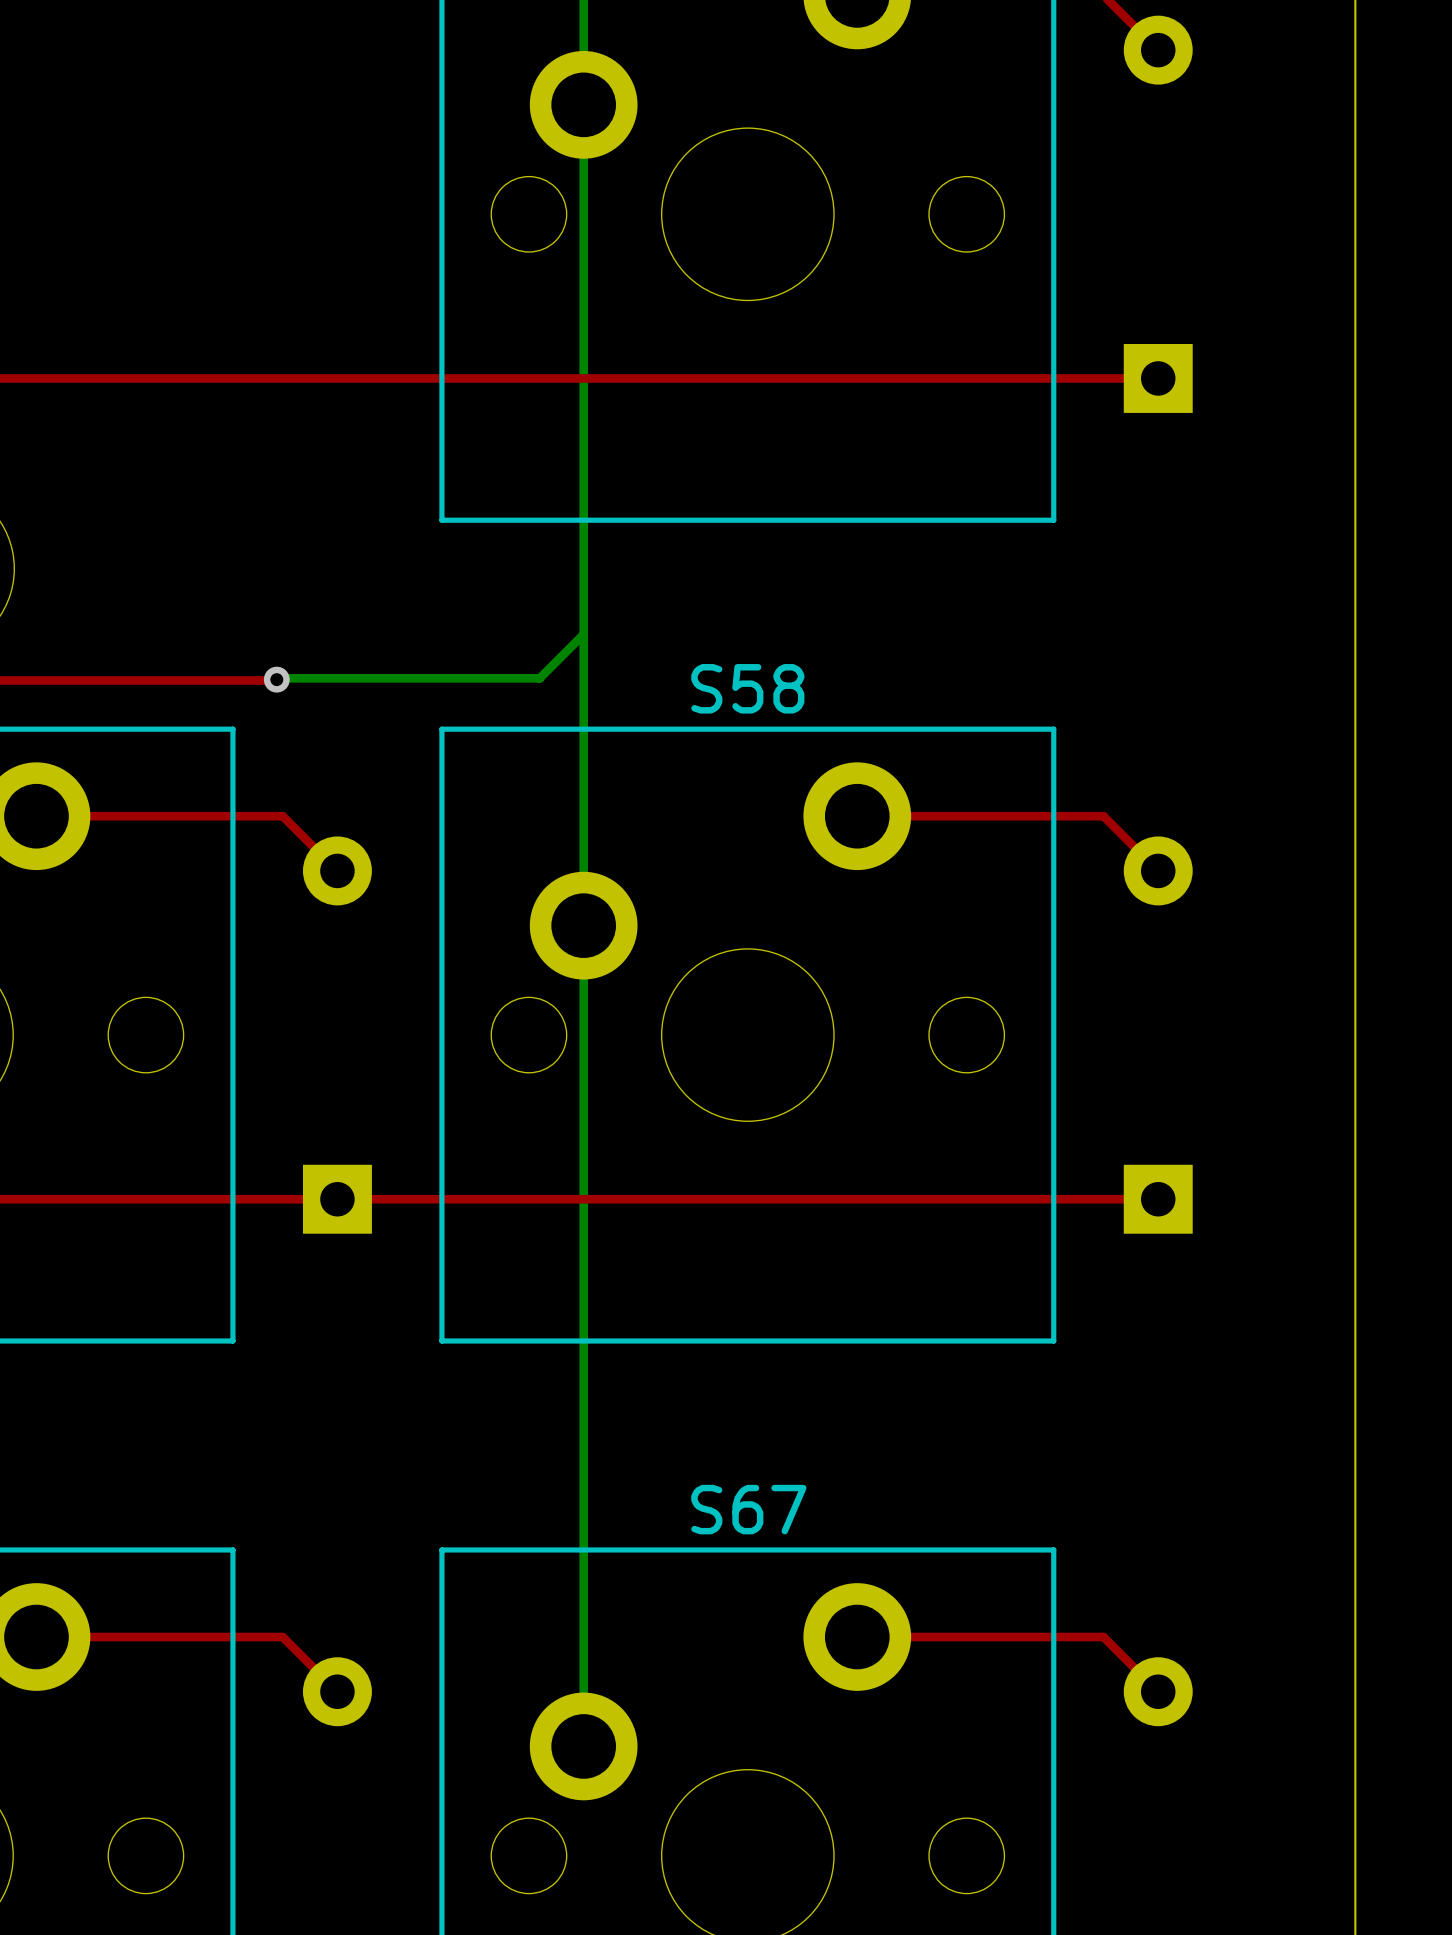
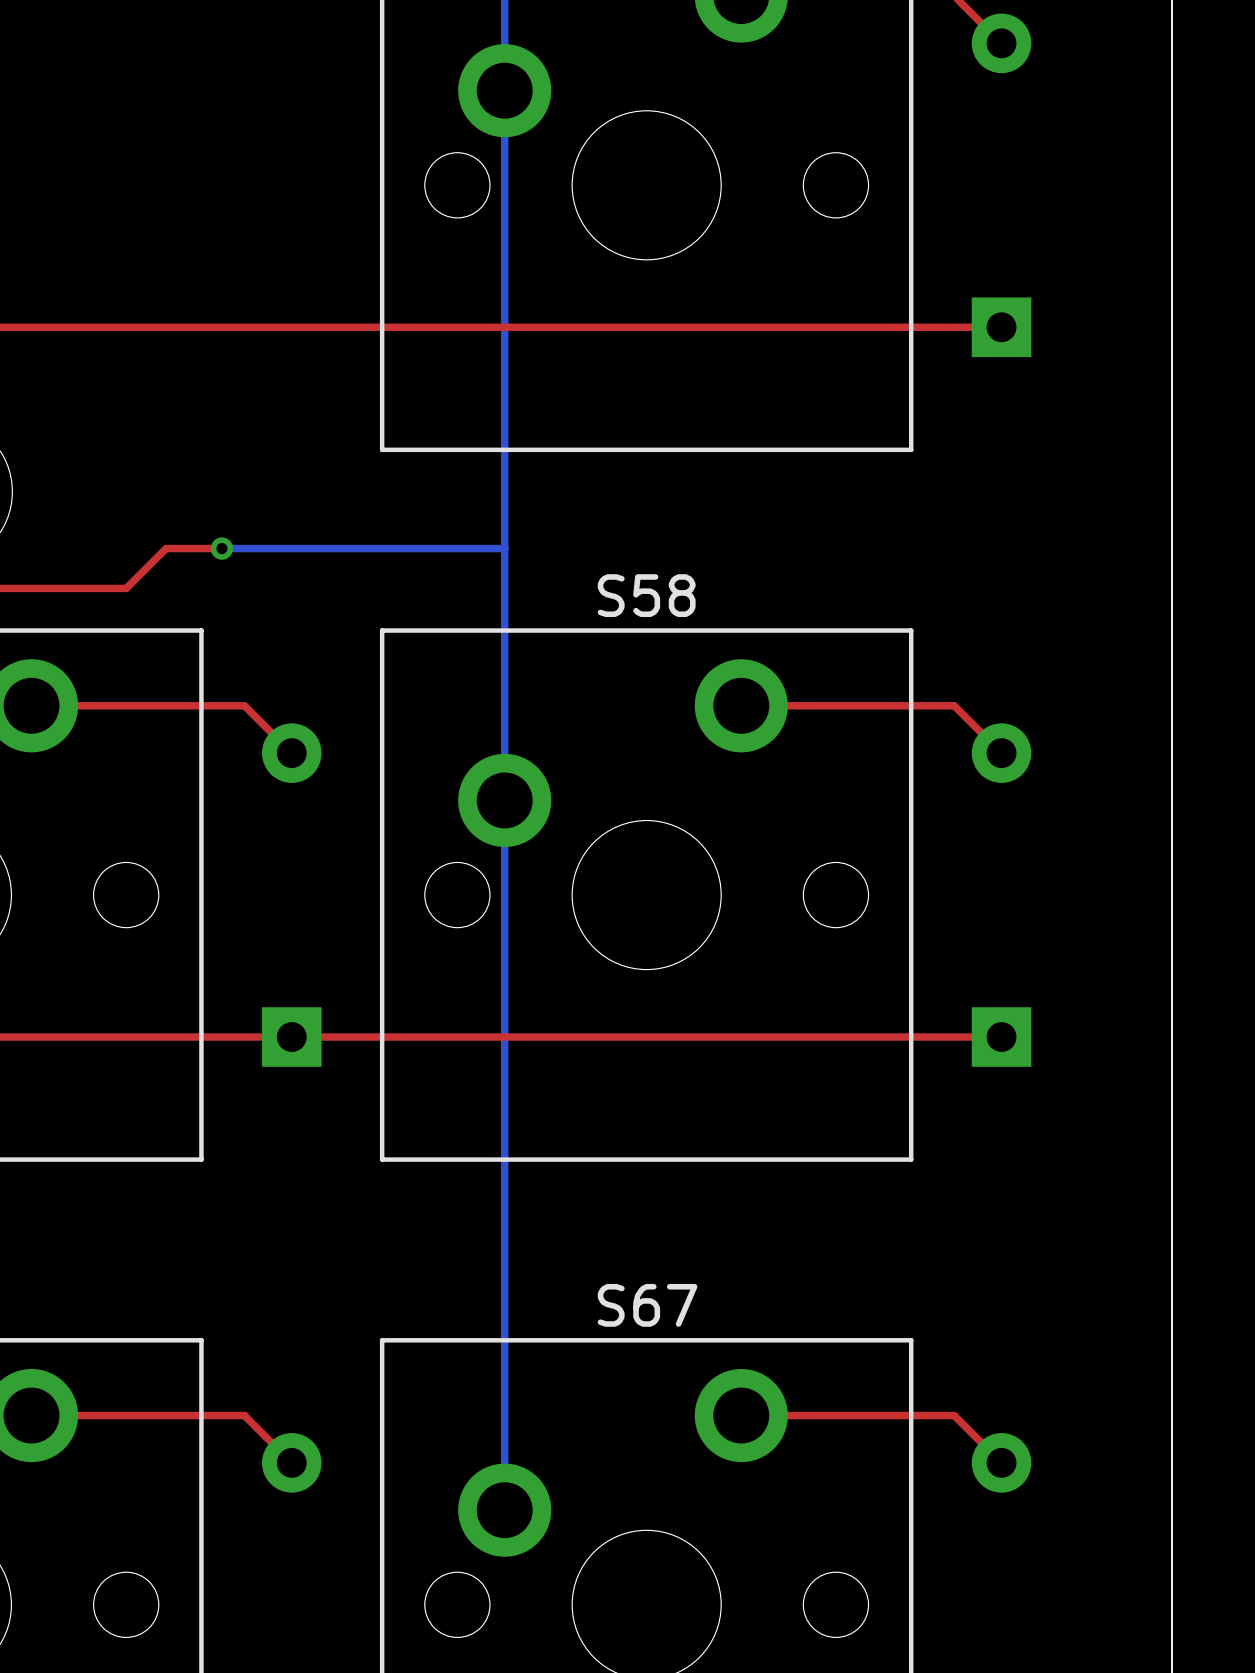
bottom track: (583, 634) (539, 678) (276, 679) -> (504, 548) (221, 548)
top track: (276, 679) (145, 680) -> (221, 548) (166, 548) (126, 588)
via position: (276, 679) -> (221, 548)

